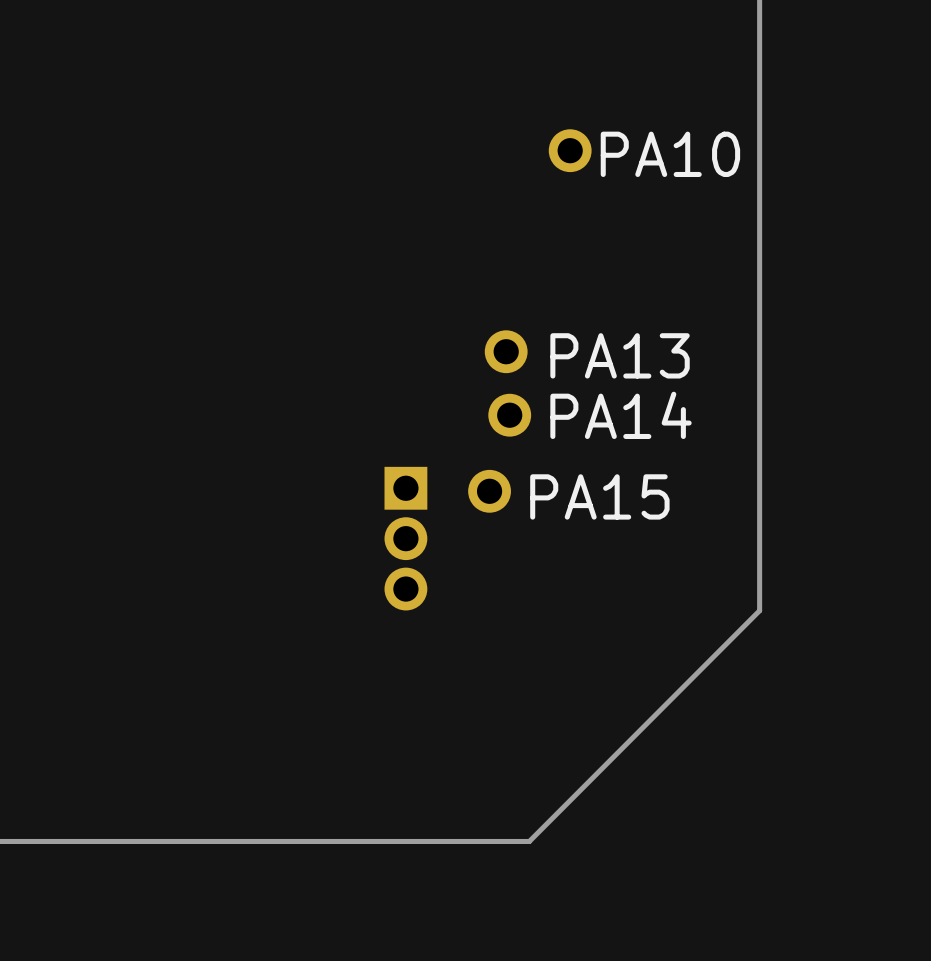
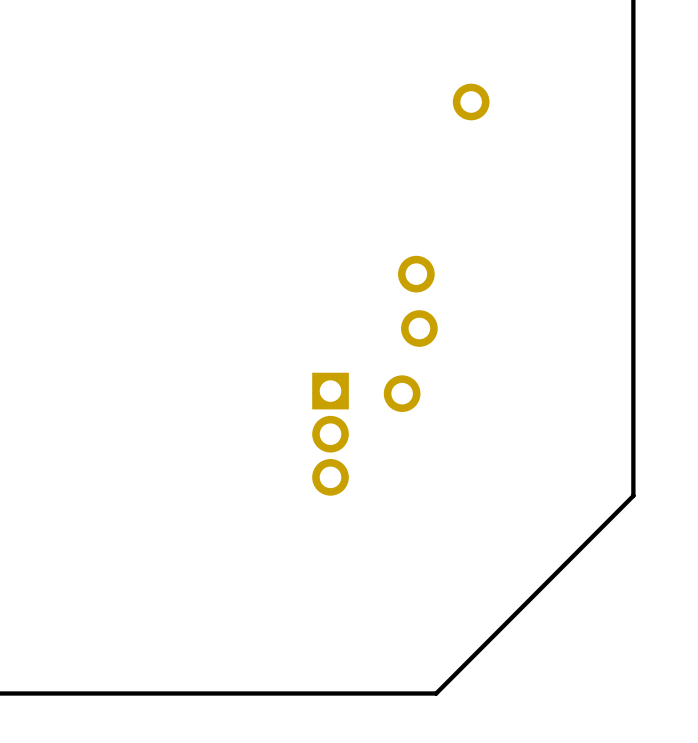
text: PA10 (670, 154) -> none
text: PA13 (620, 355) -> none
text: PA14 (621, 415) -> none
text: PA15 (599, 496) -> none

